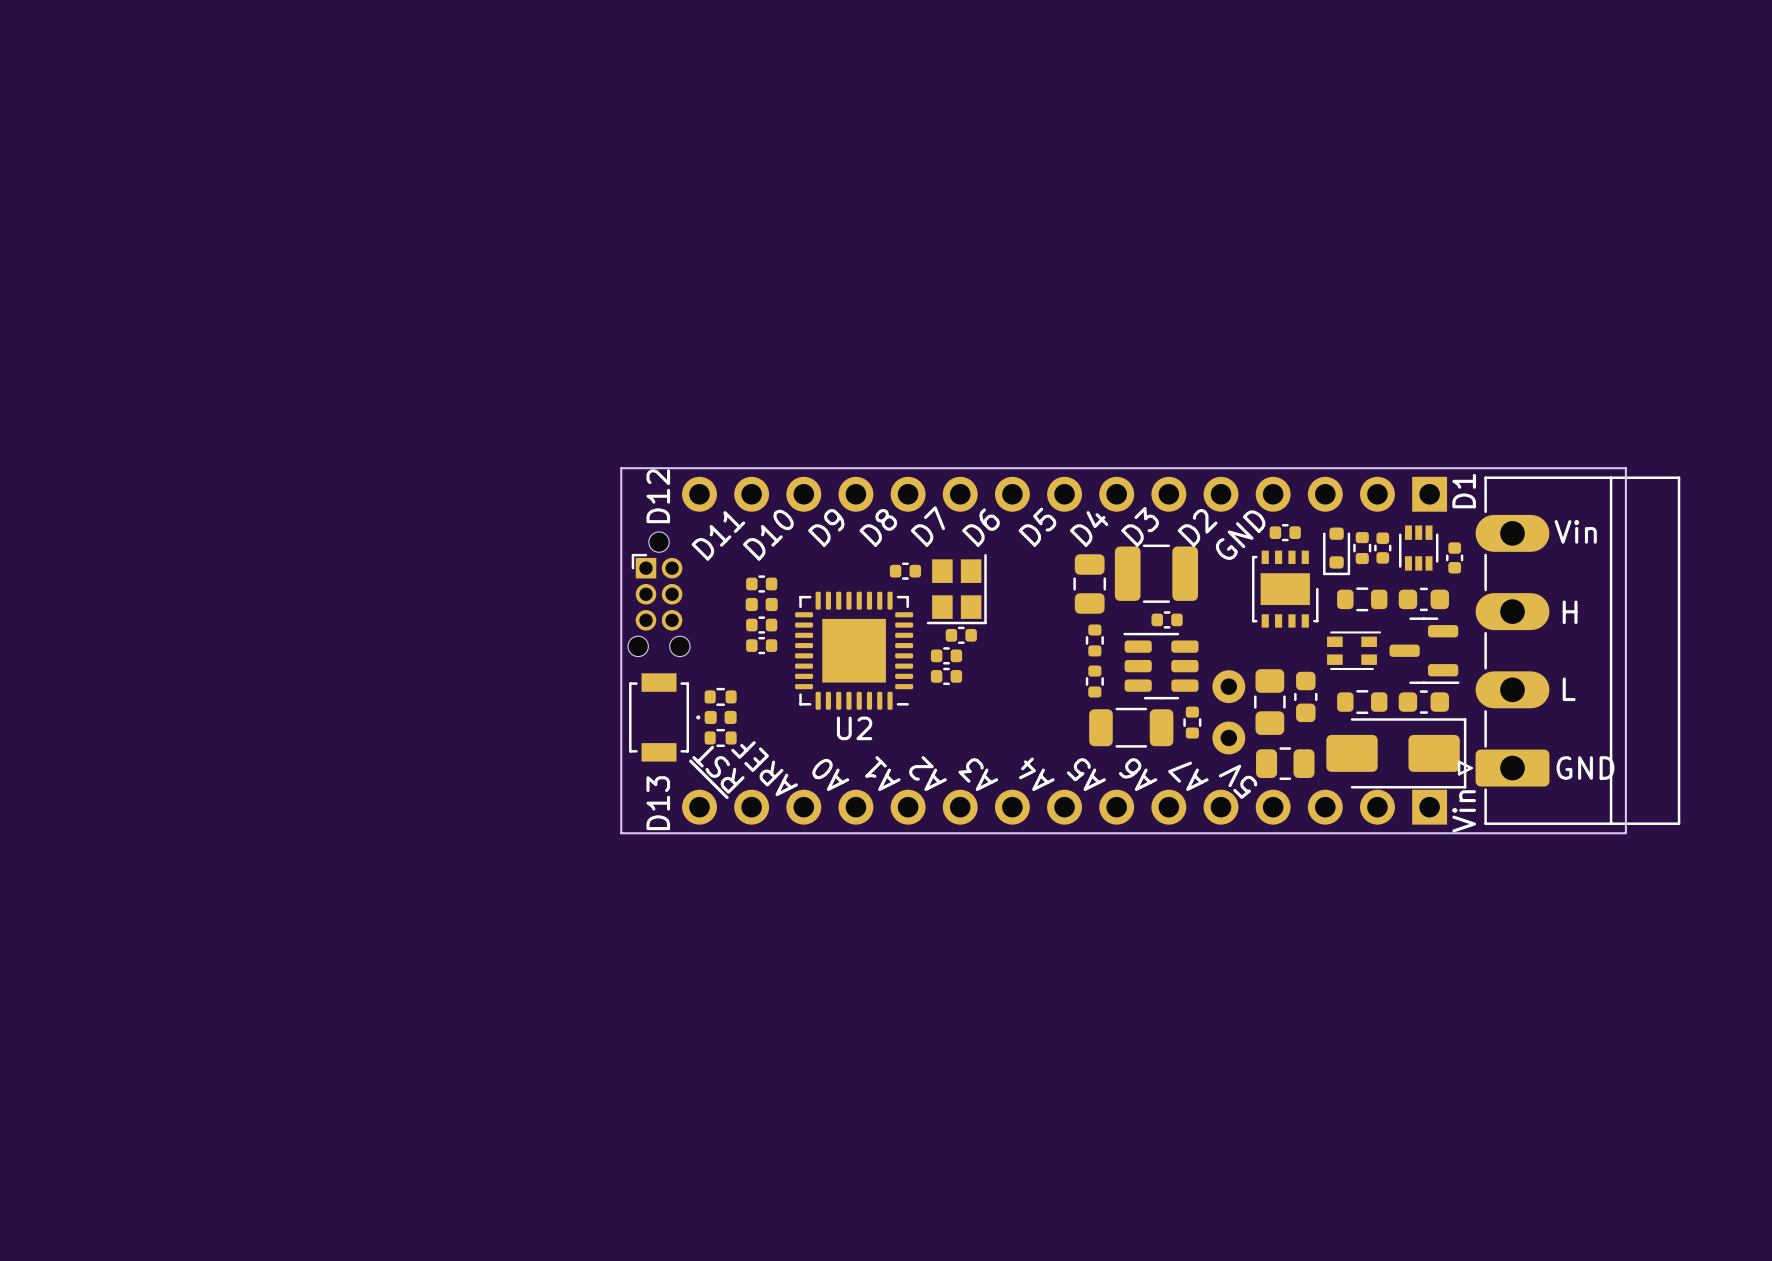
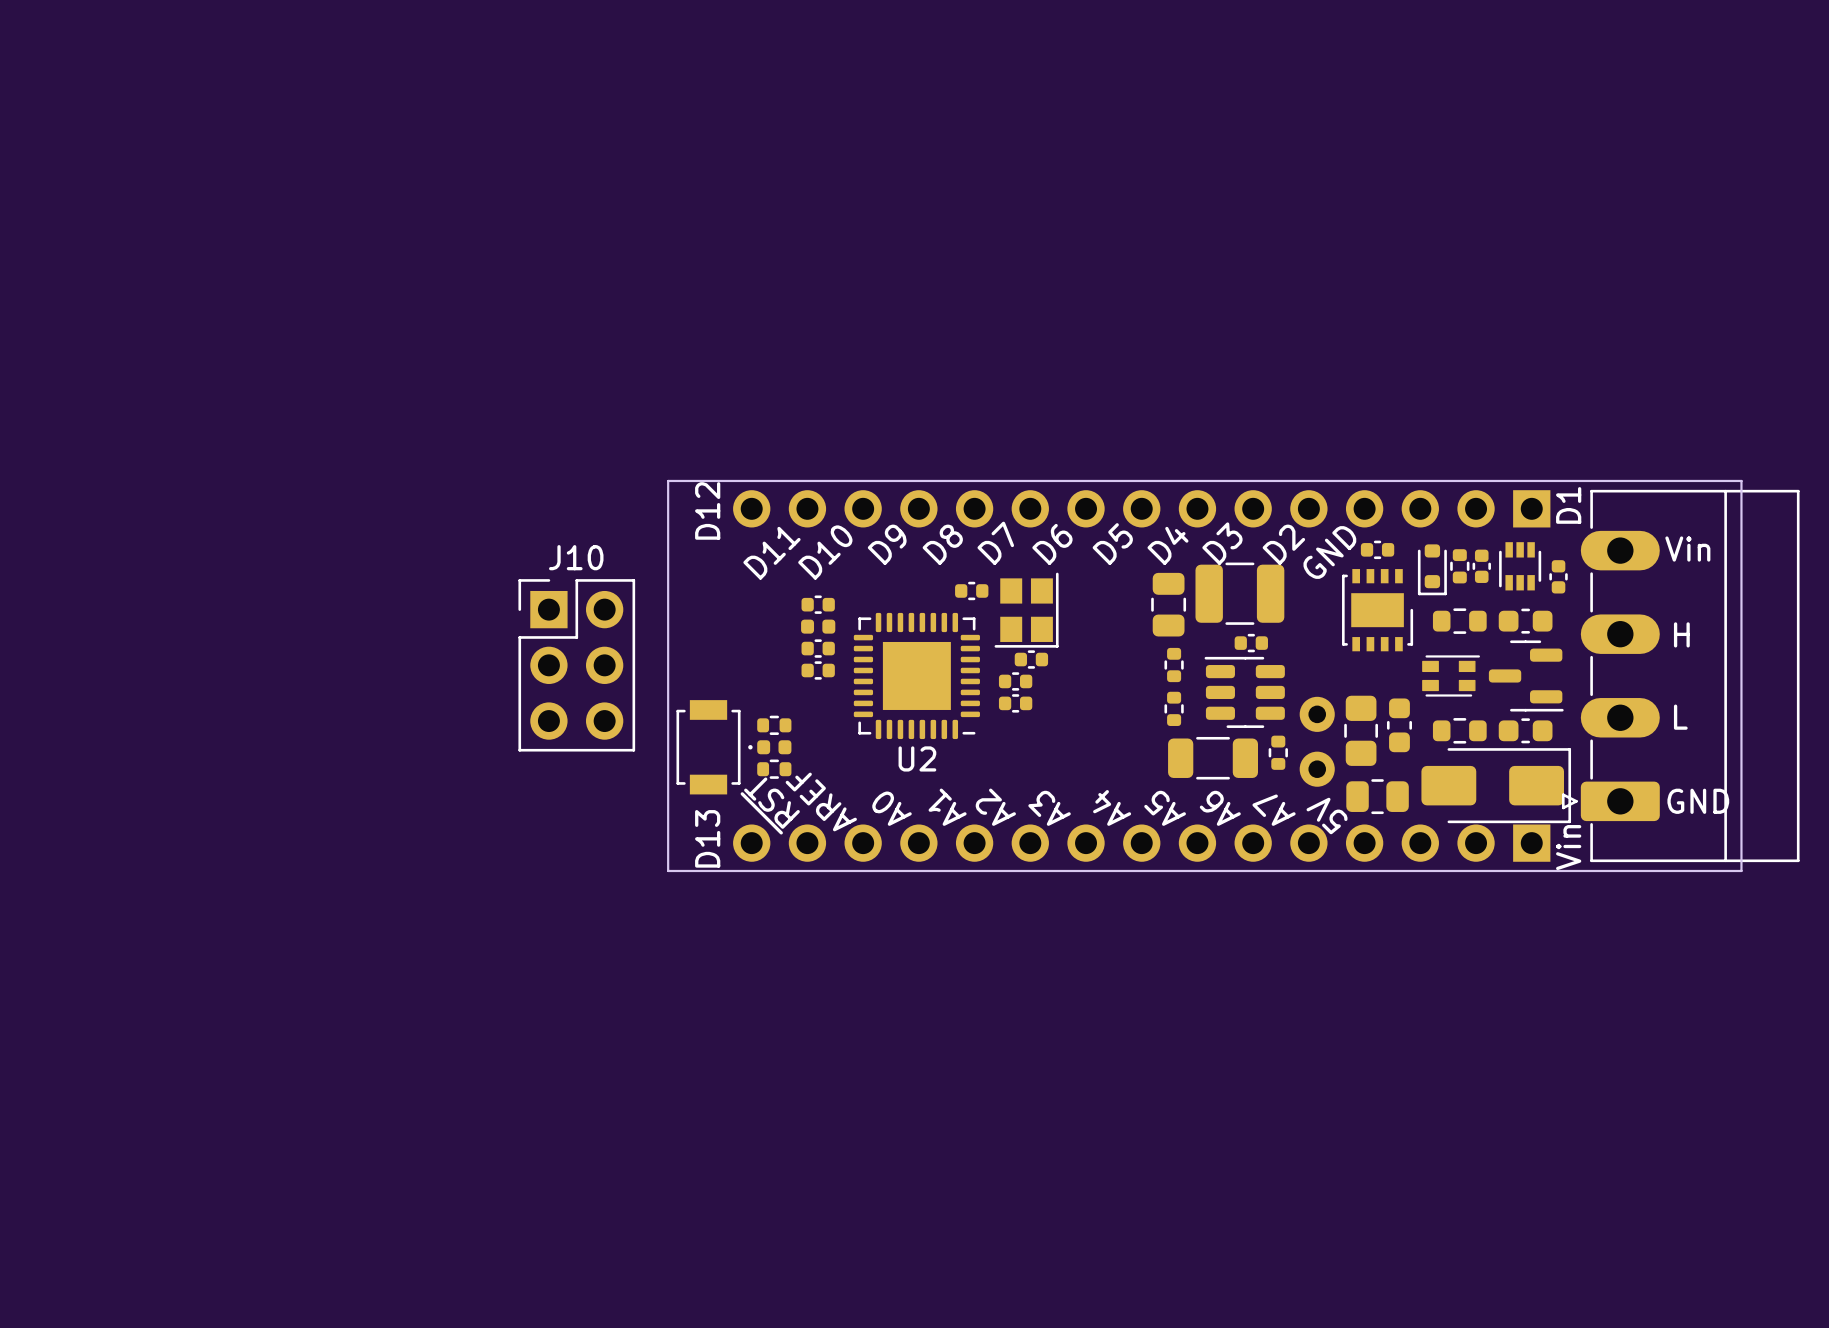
part: (659, 594) -> none
J10: none -> (576, 665)

